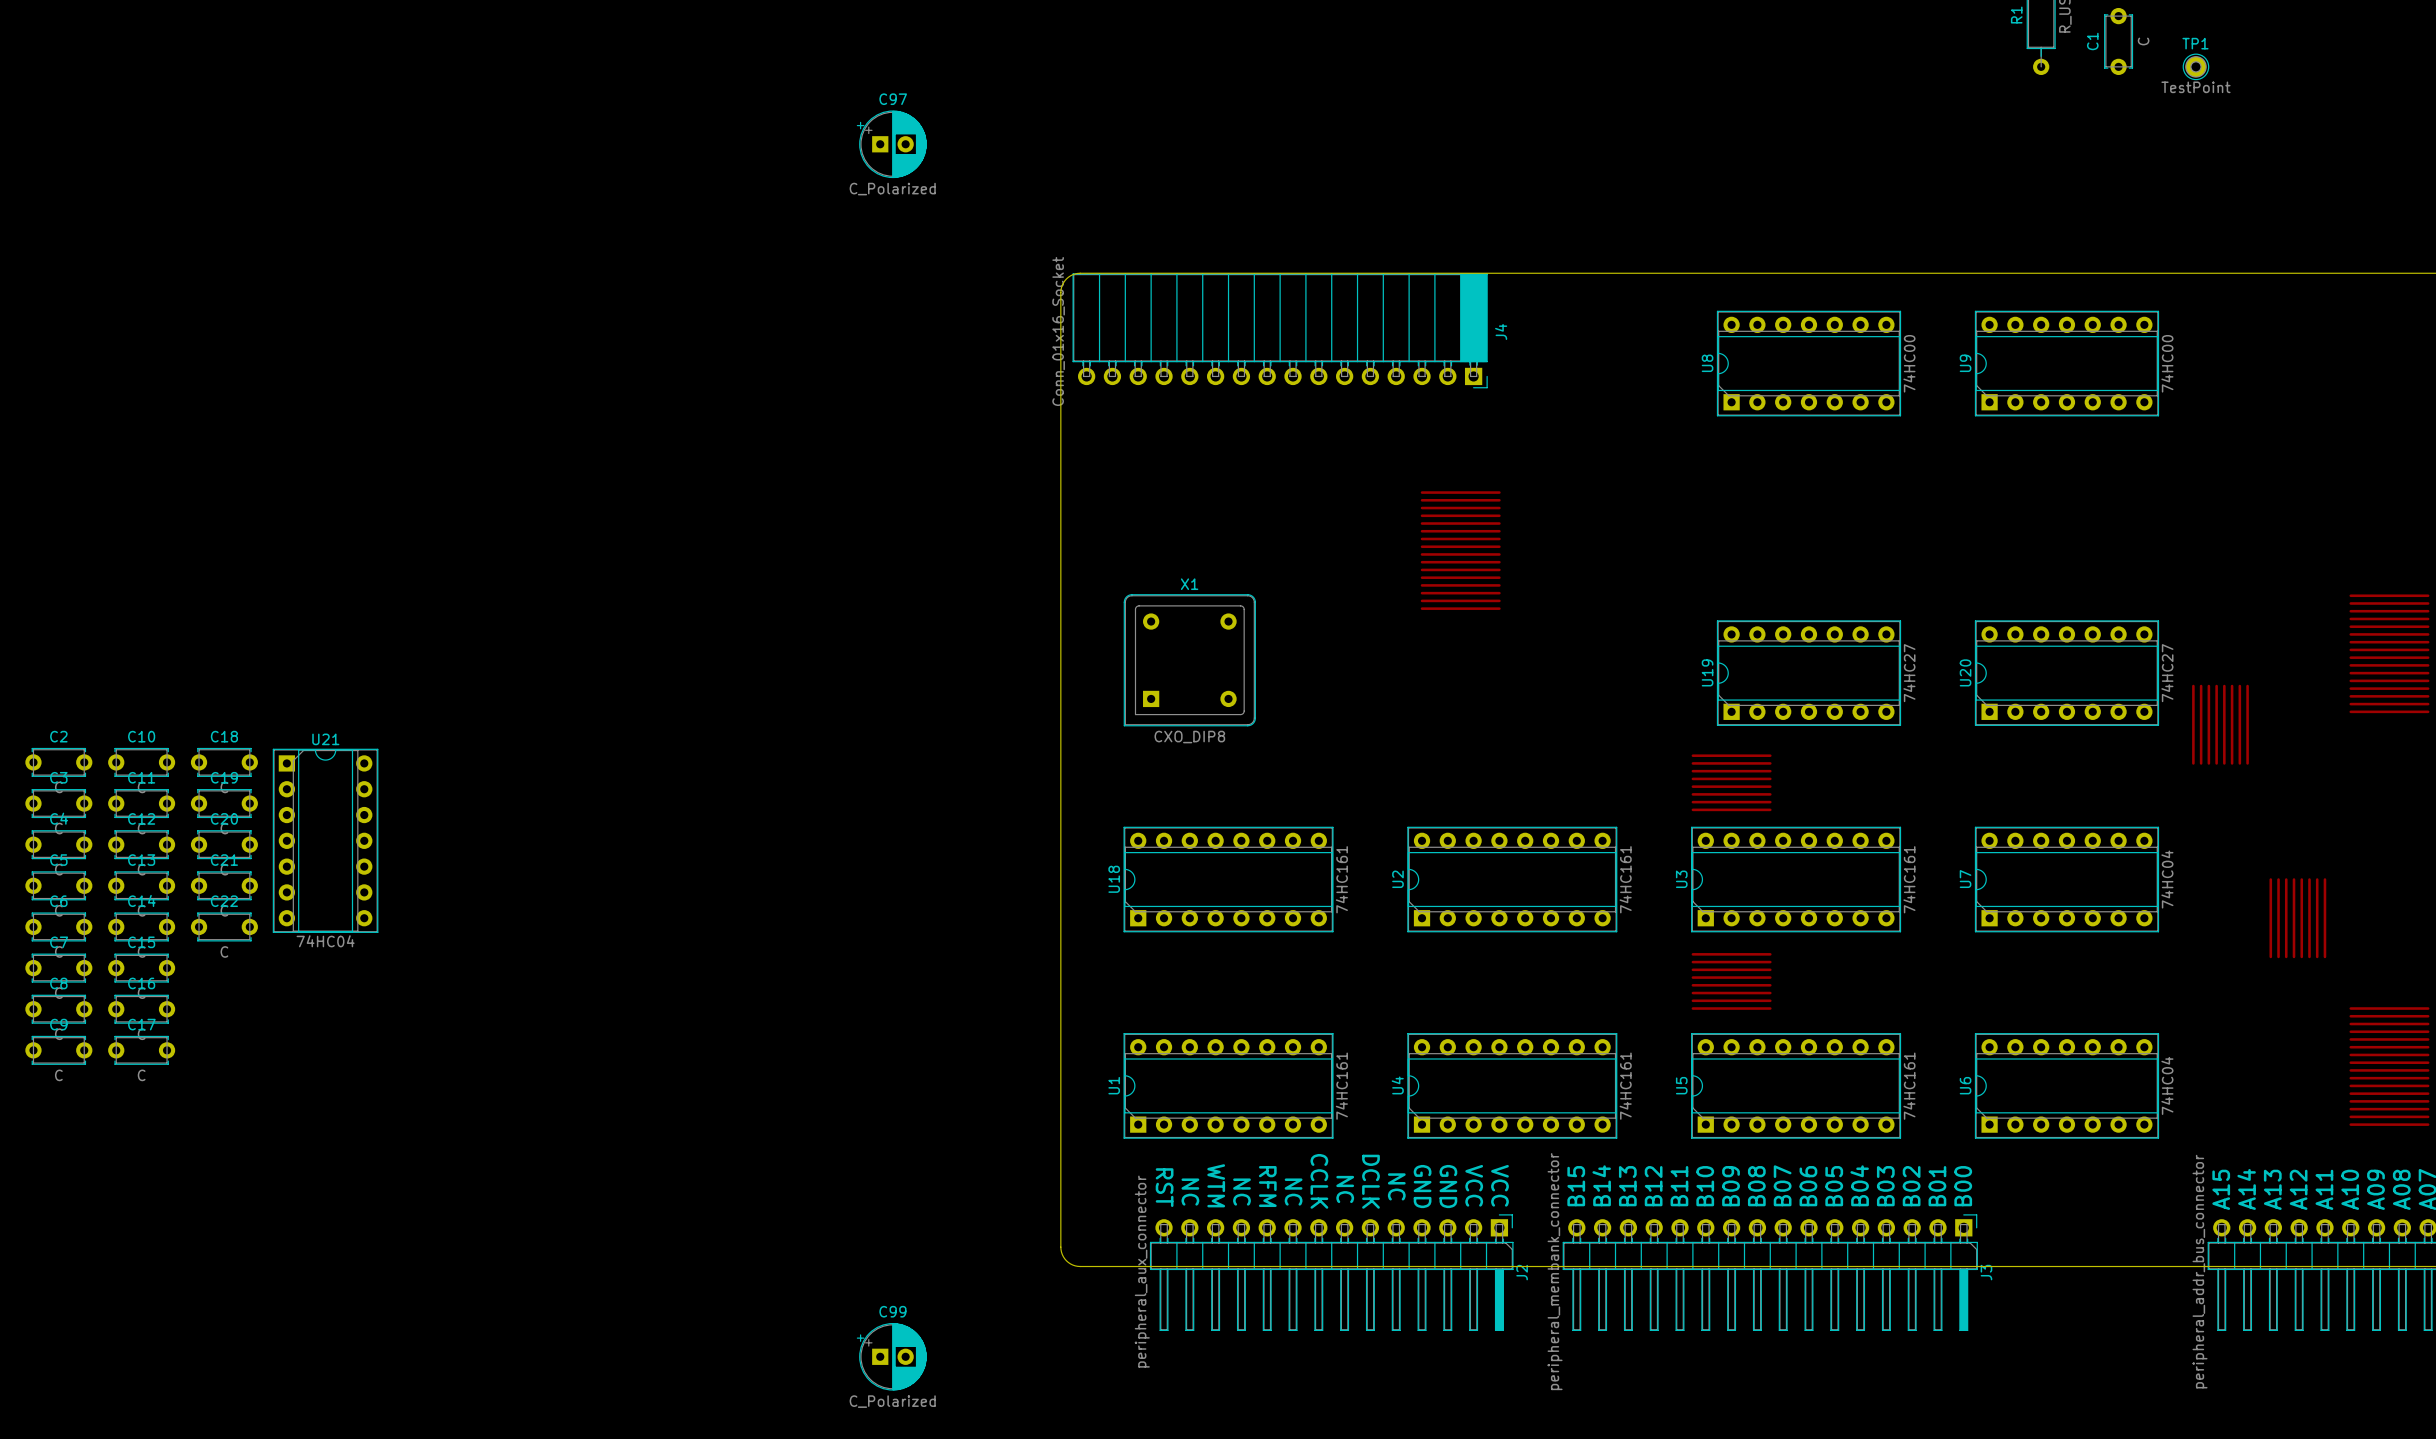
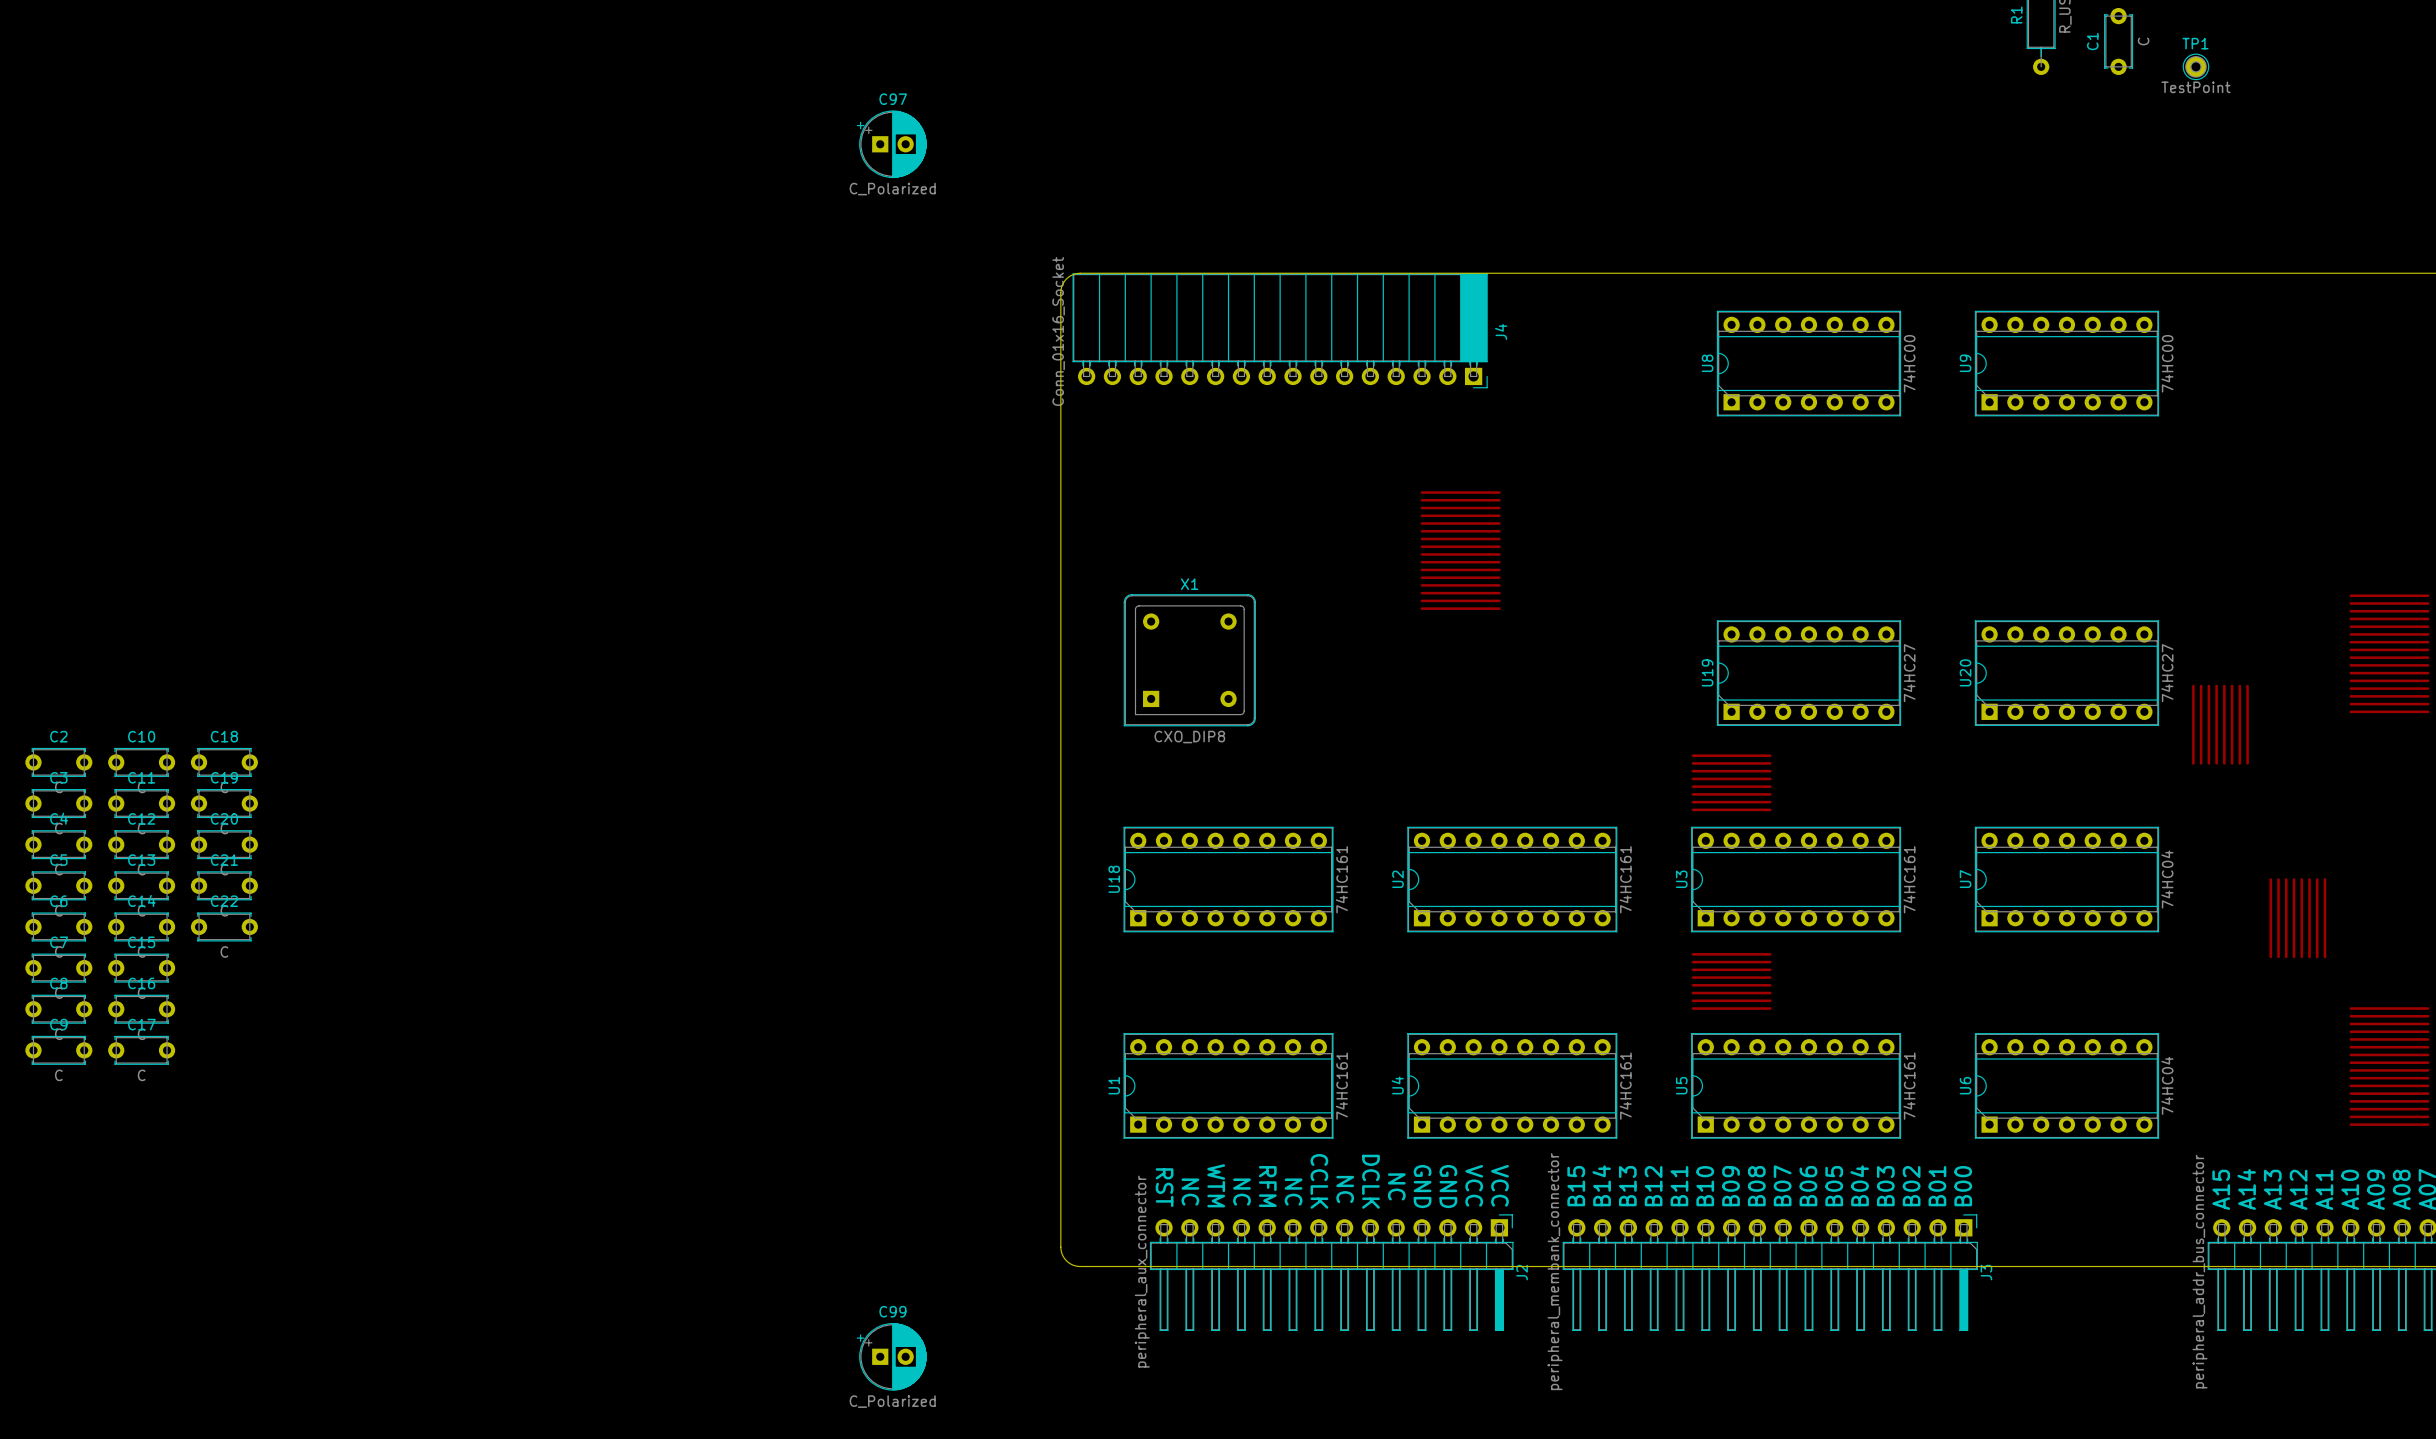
U21: 74HC04 (325, 840) -> none

